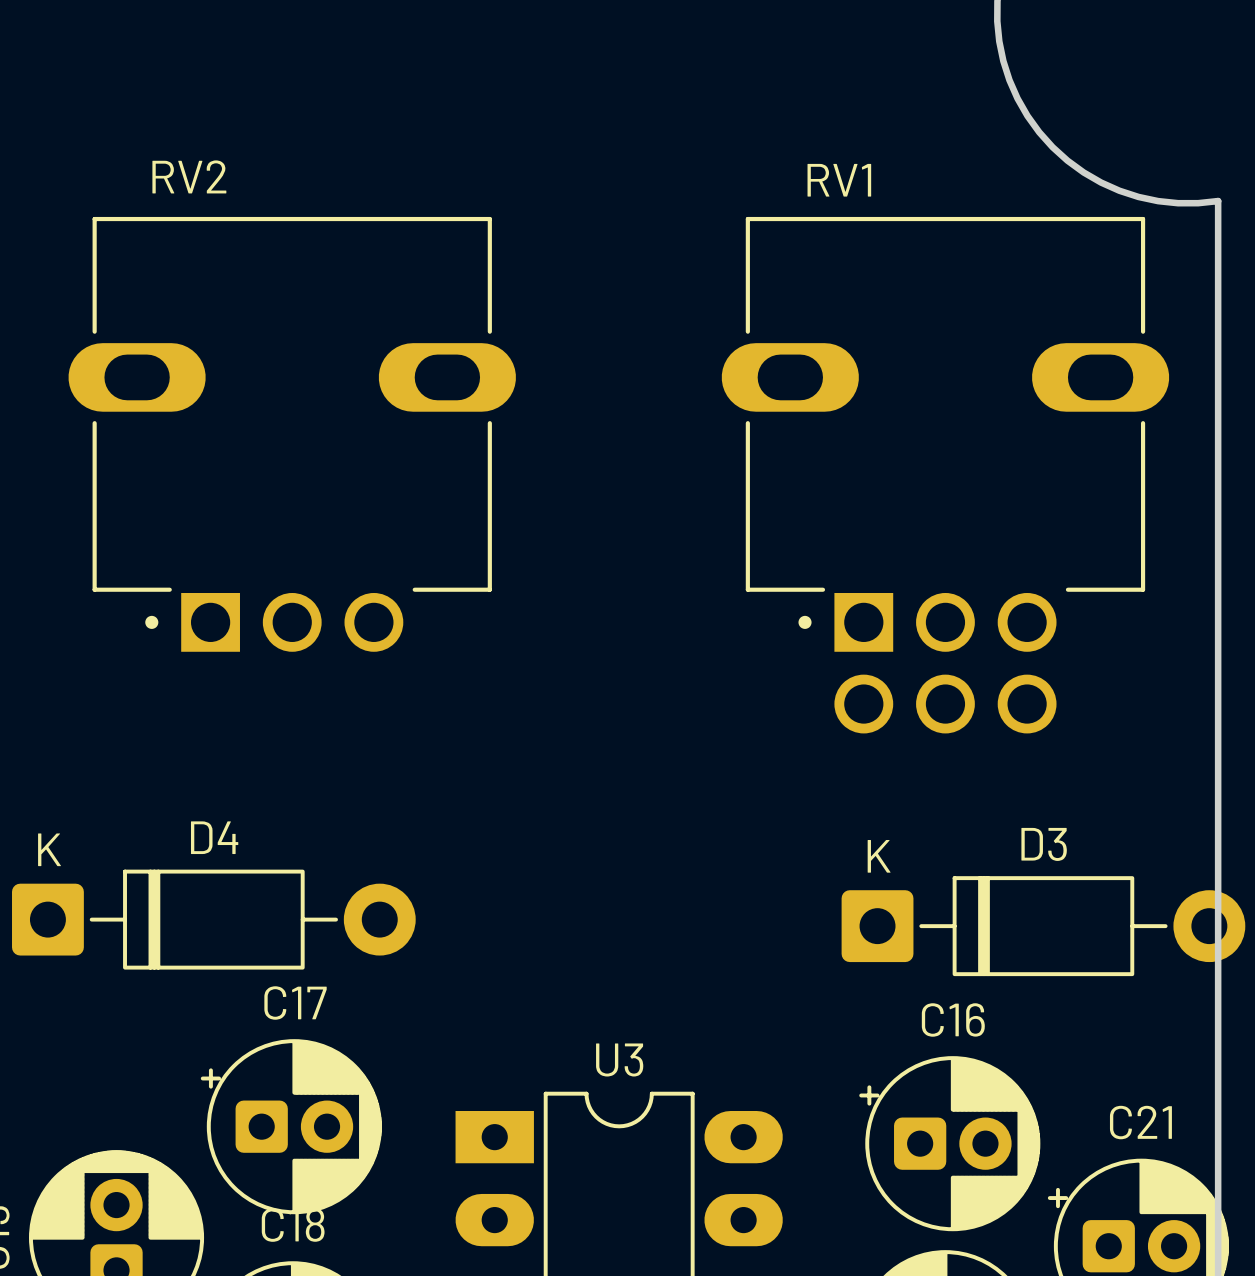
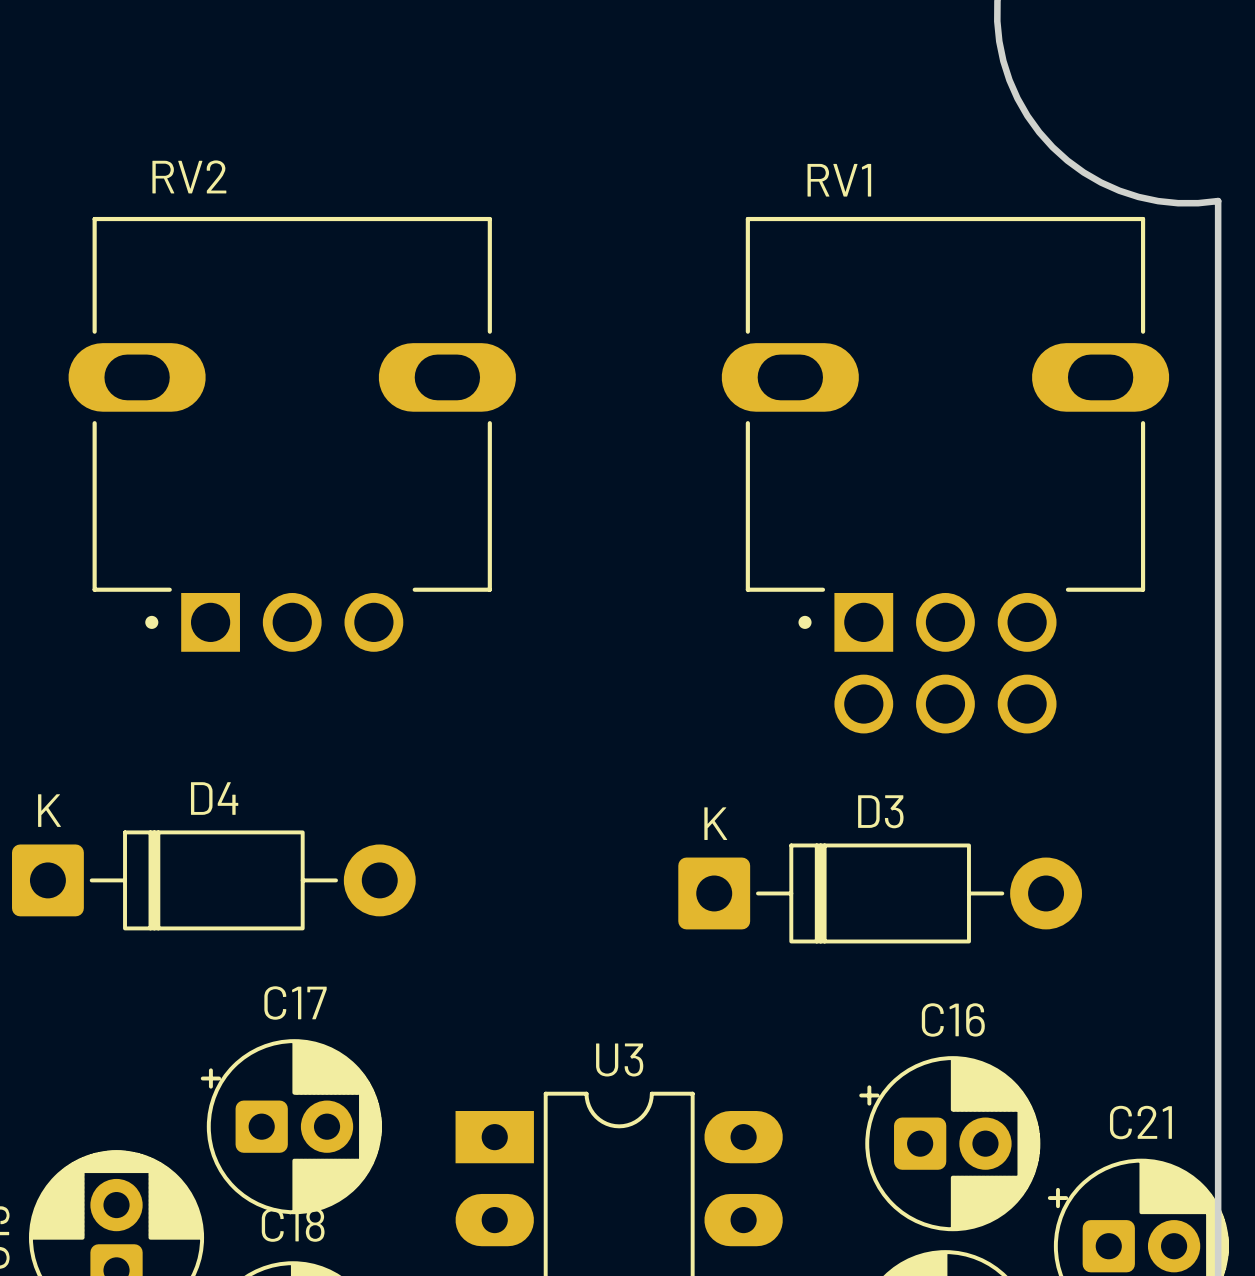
D4 position: (213, 919) -> (213, 880)
D3 position: (1043, 926) -> (880, 893)

